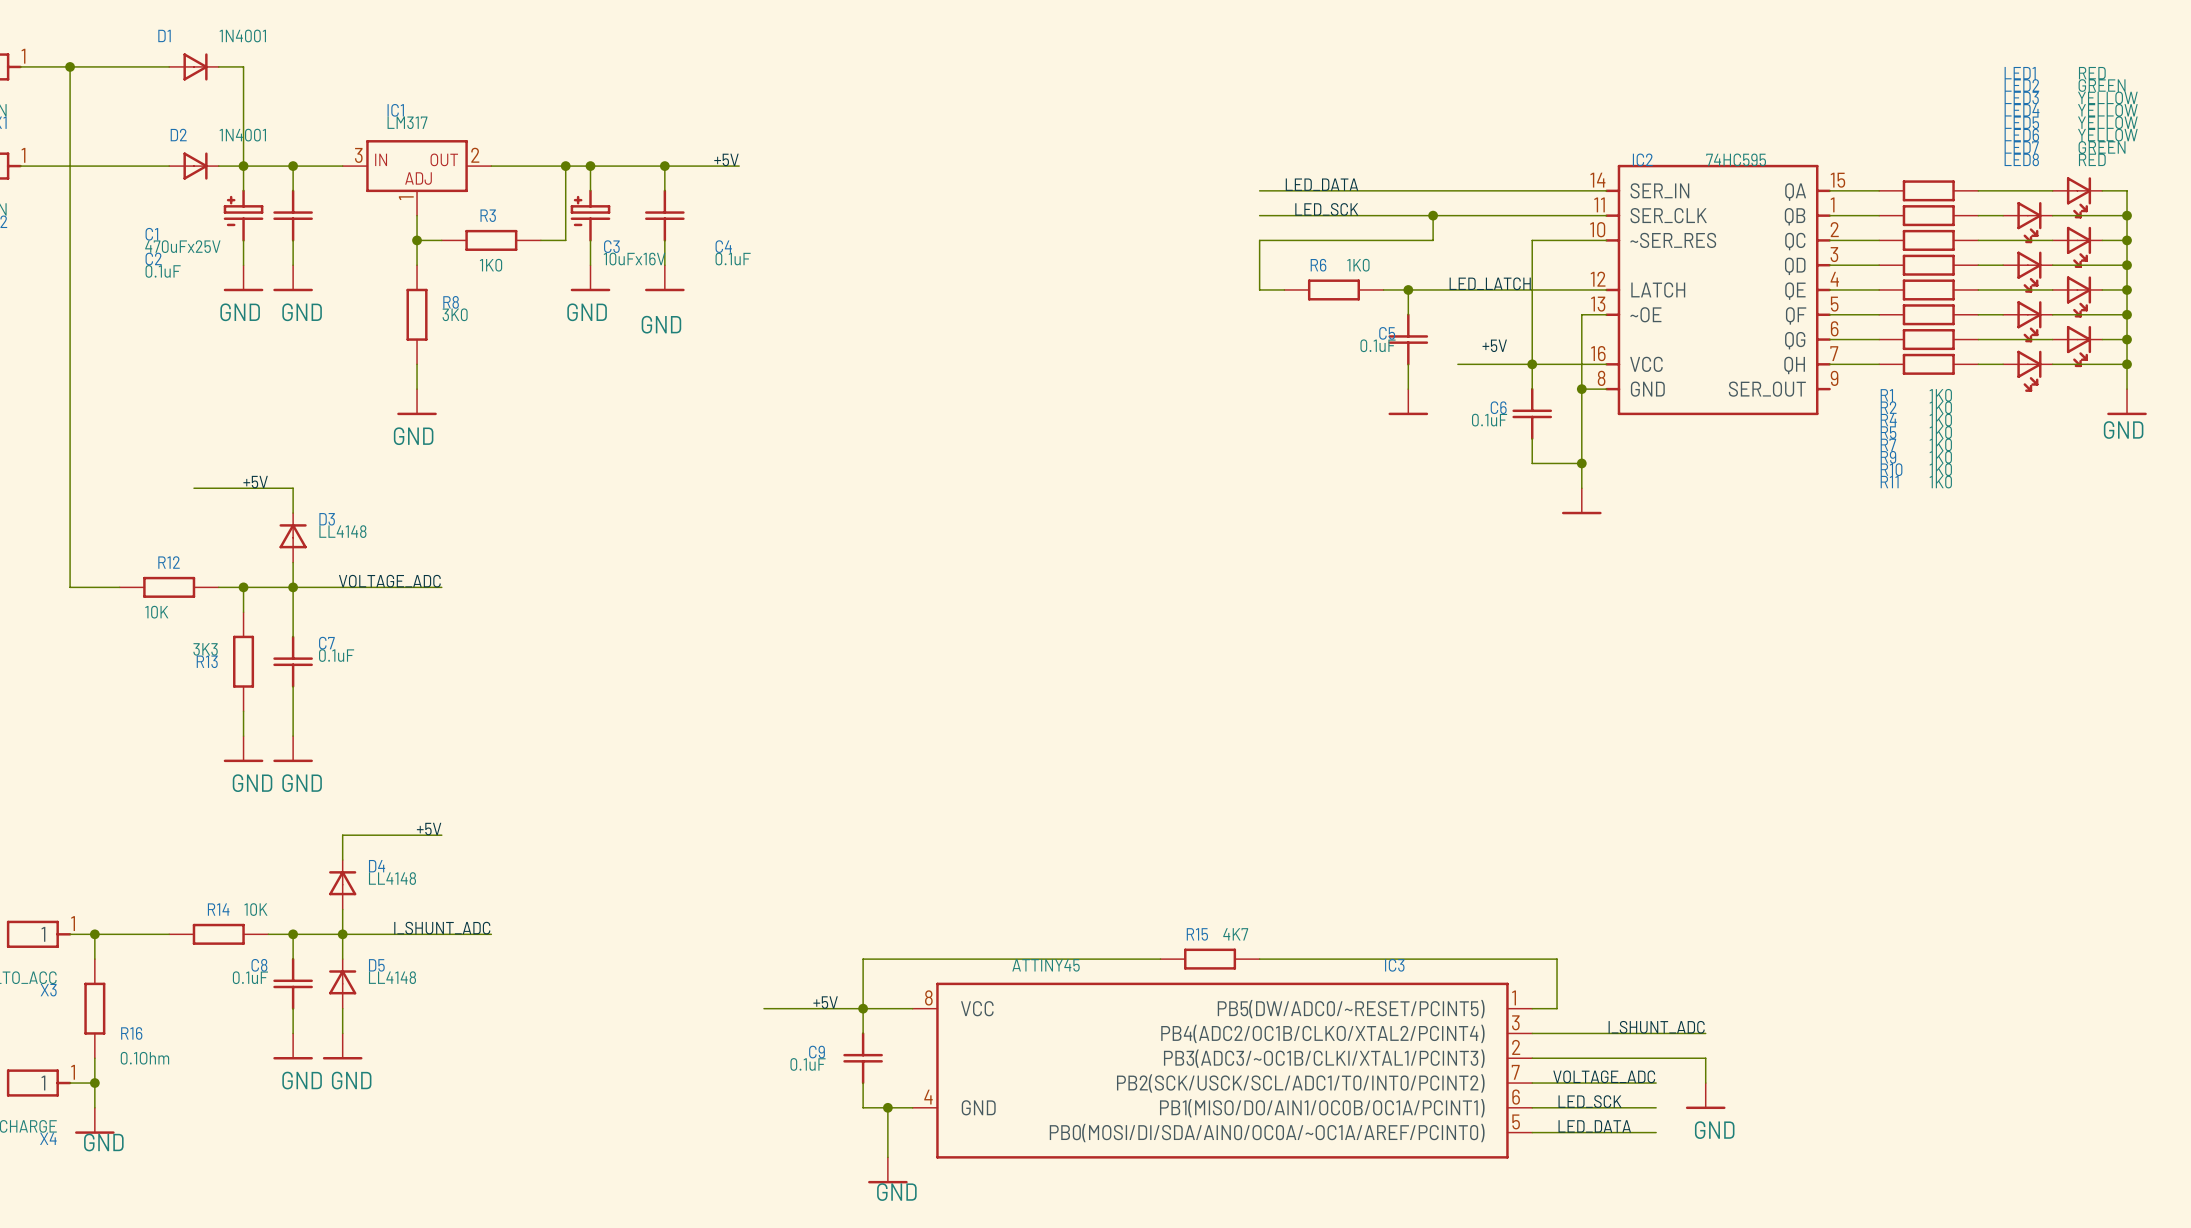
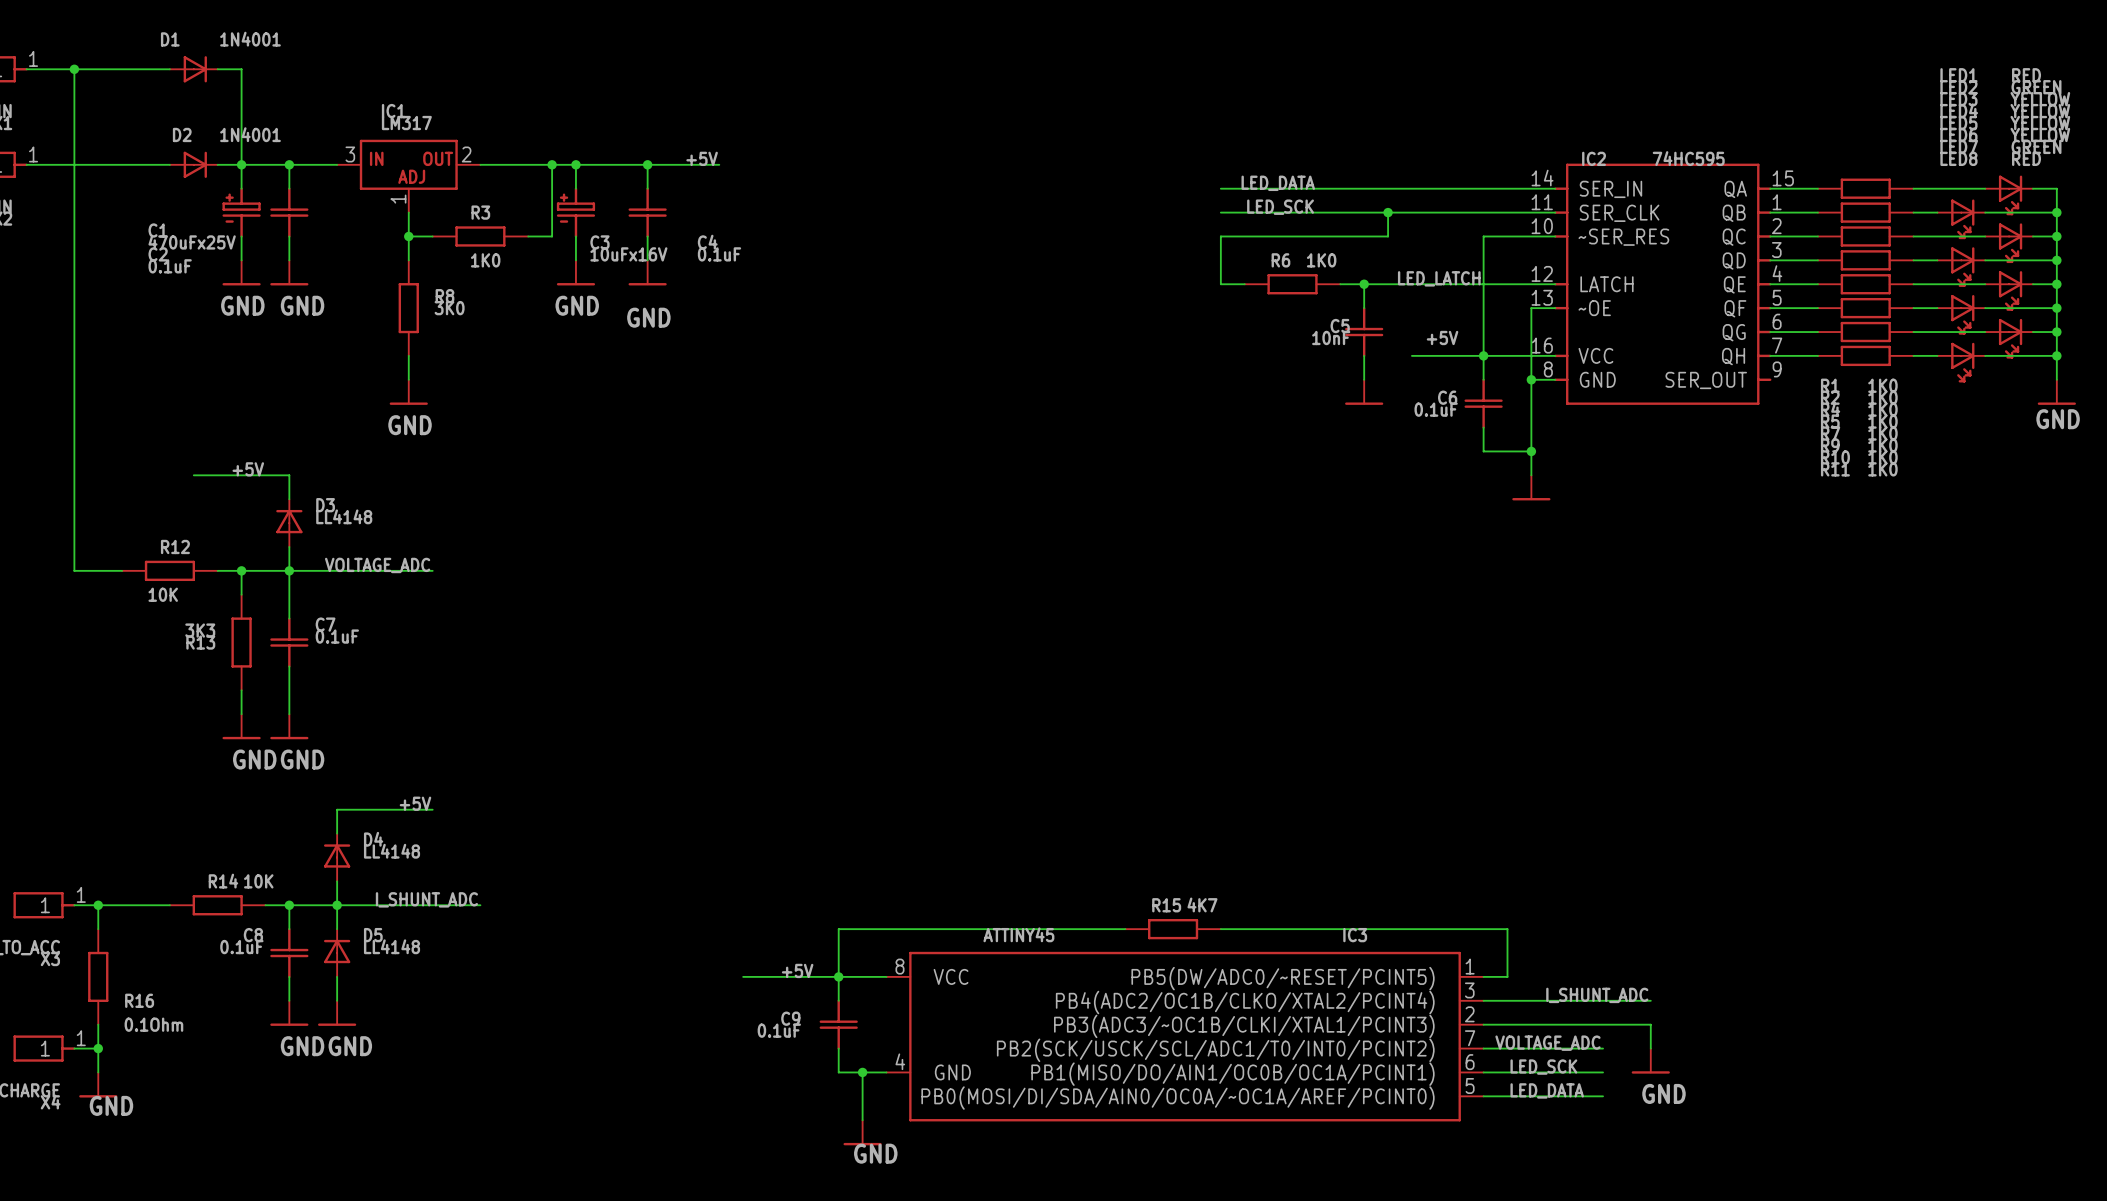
C5 value: 0.1uF (1378, 345) -> 10nF (1331, 337)

